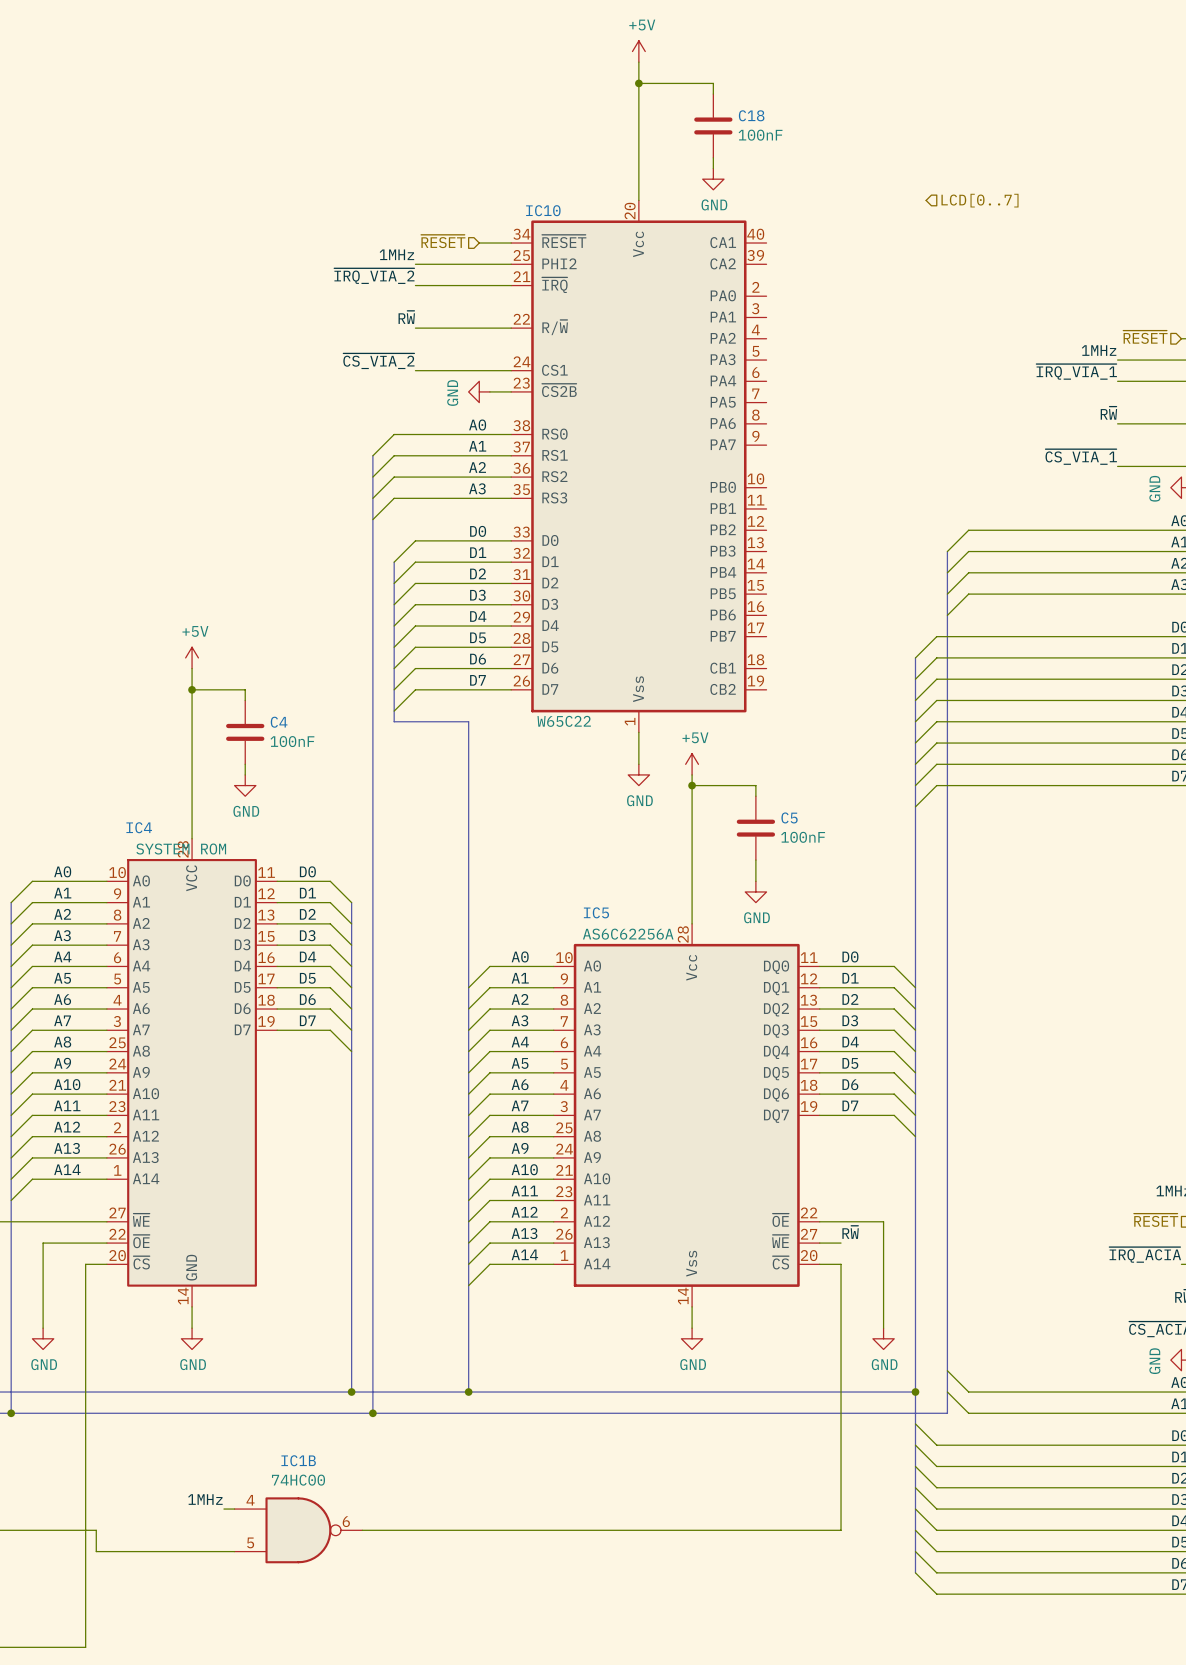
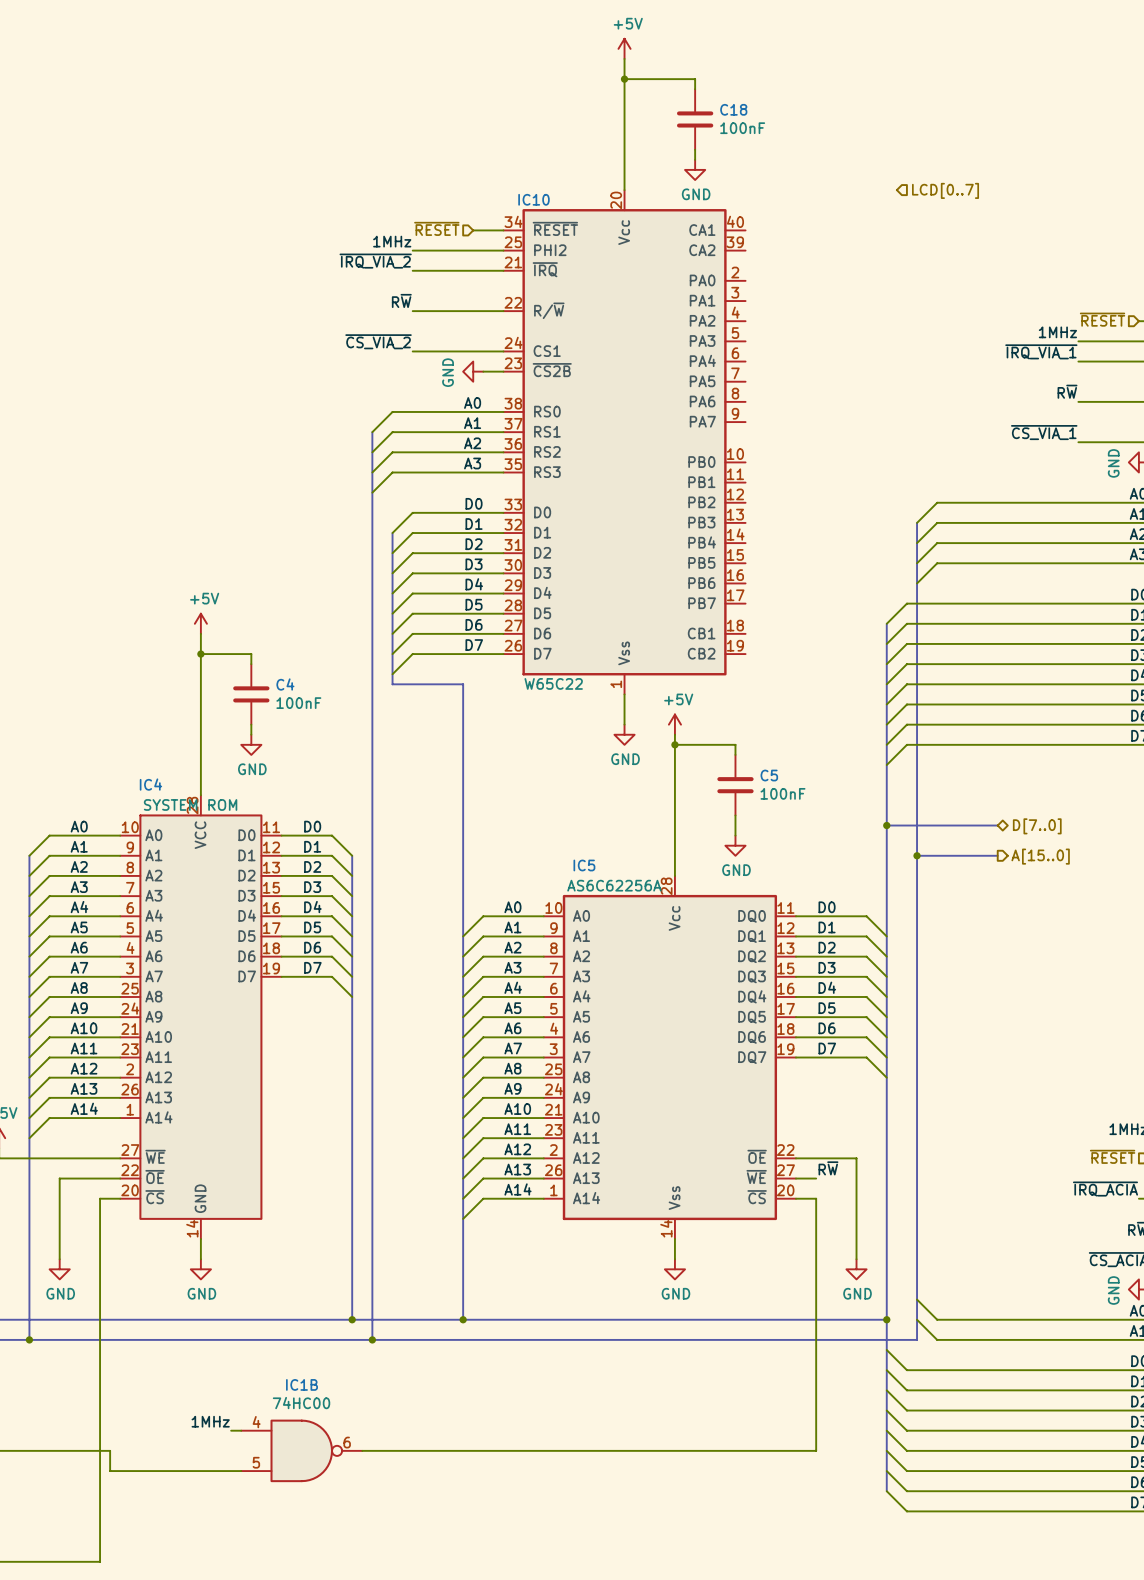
bus: none -> (886, 825) (997, 825)
junction: none -> (886, 825)
hierarchical label: none -> D[7..0] (1037, 826)
bus: none -> (917, 855) (997, 855)
junction: none -> (917, 855)
hierarchical label: none -> A[15..0] (1040, 856)

